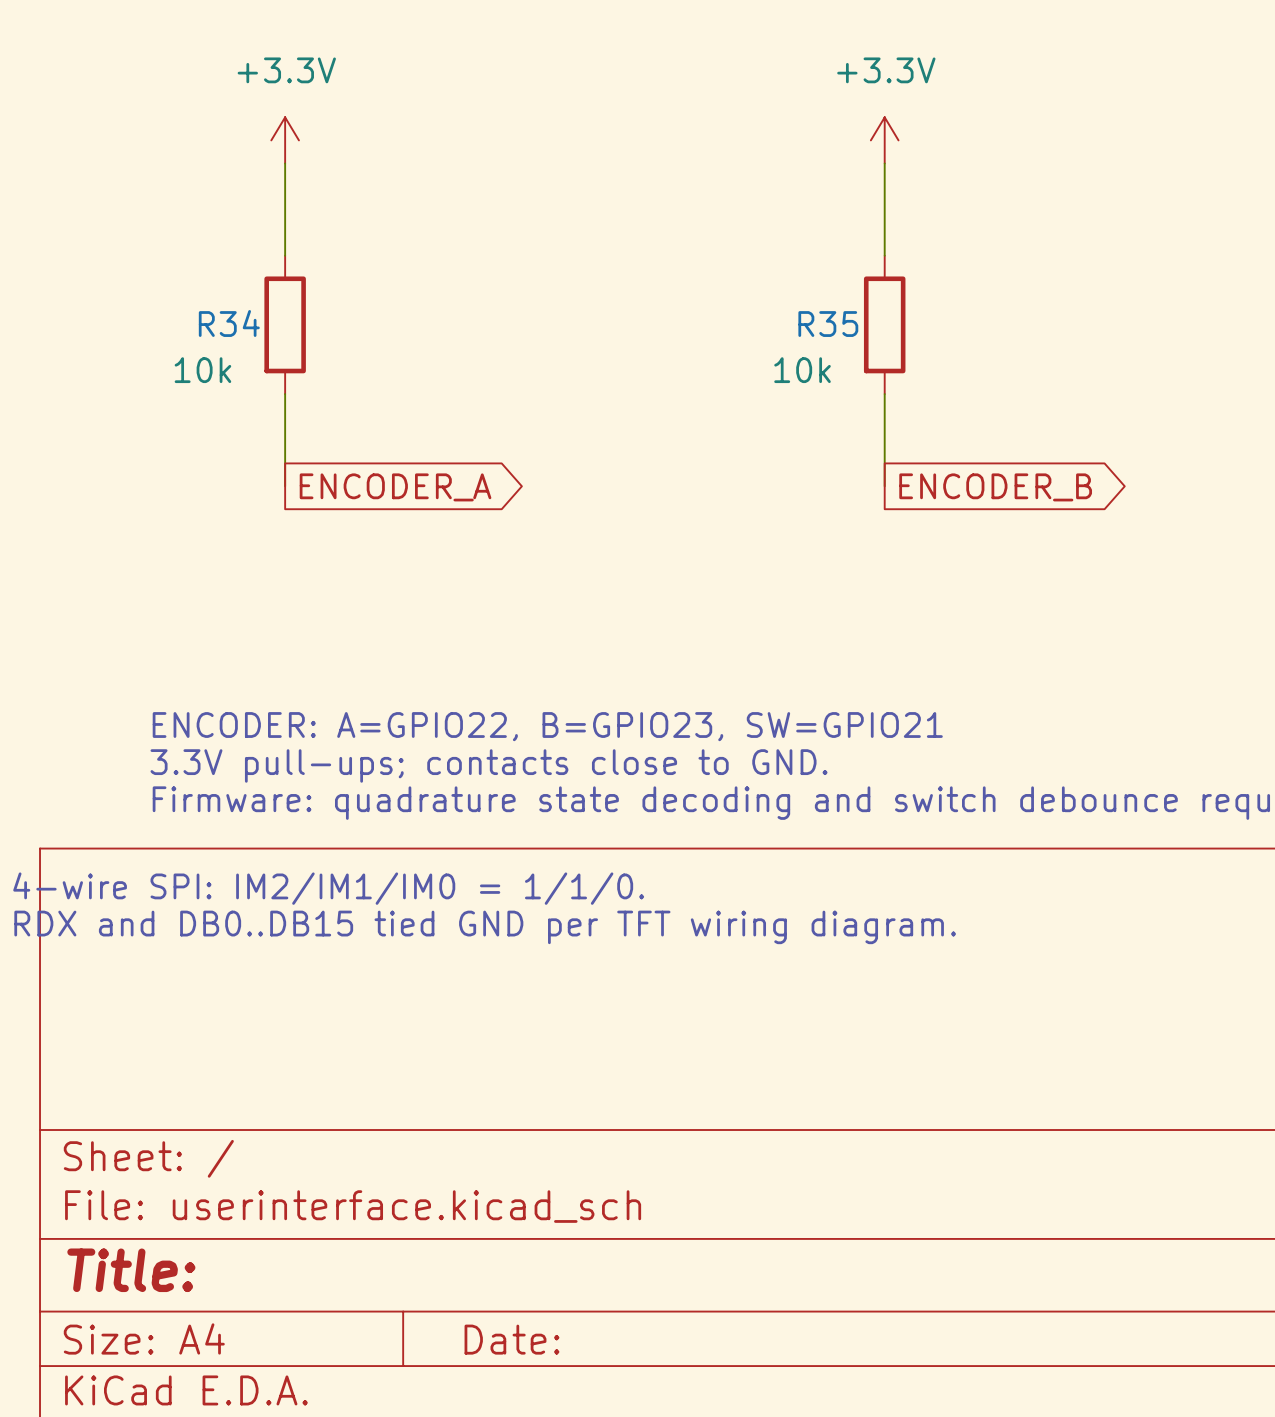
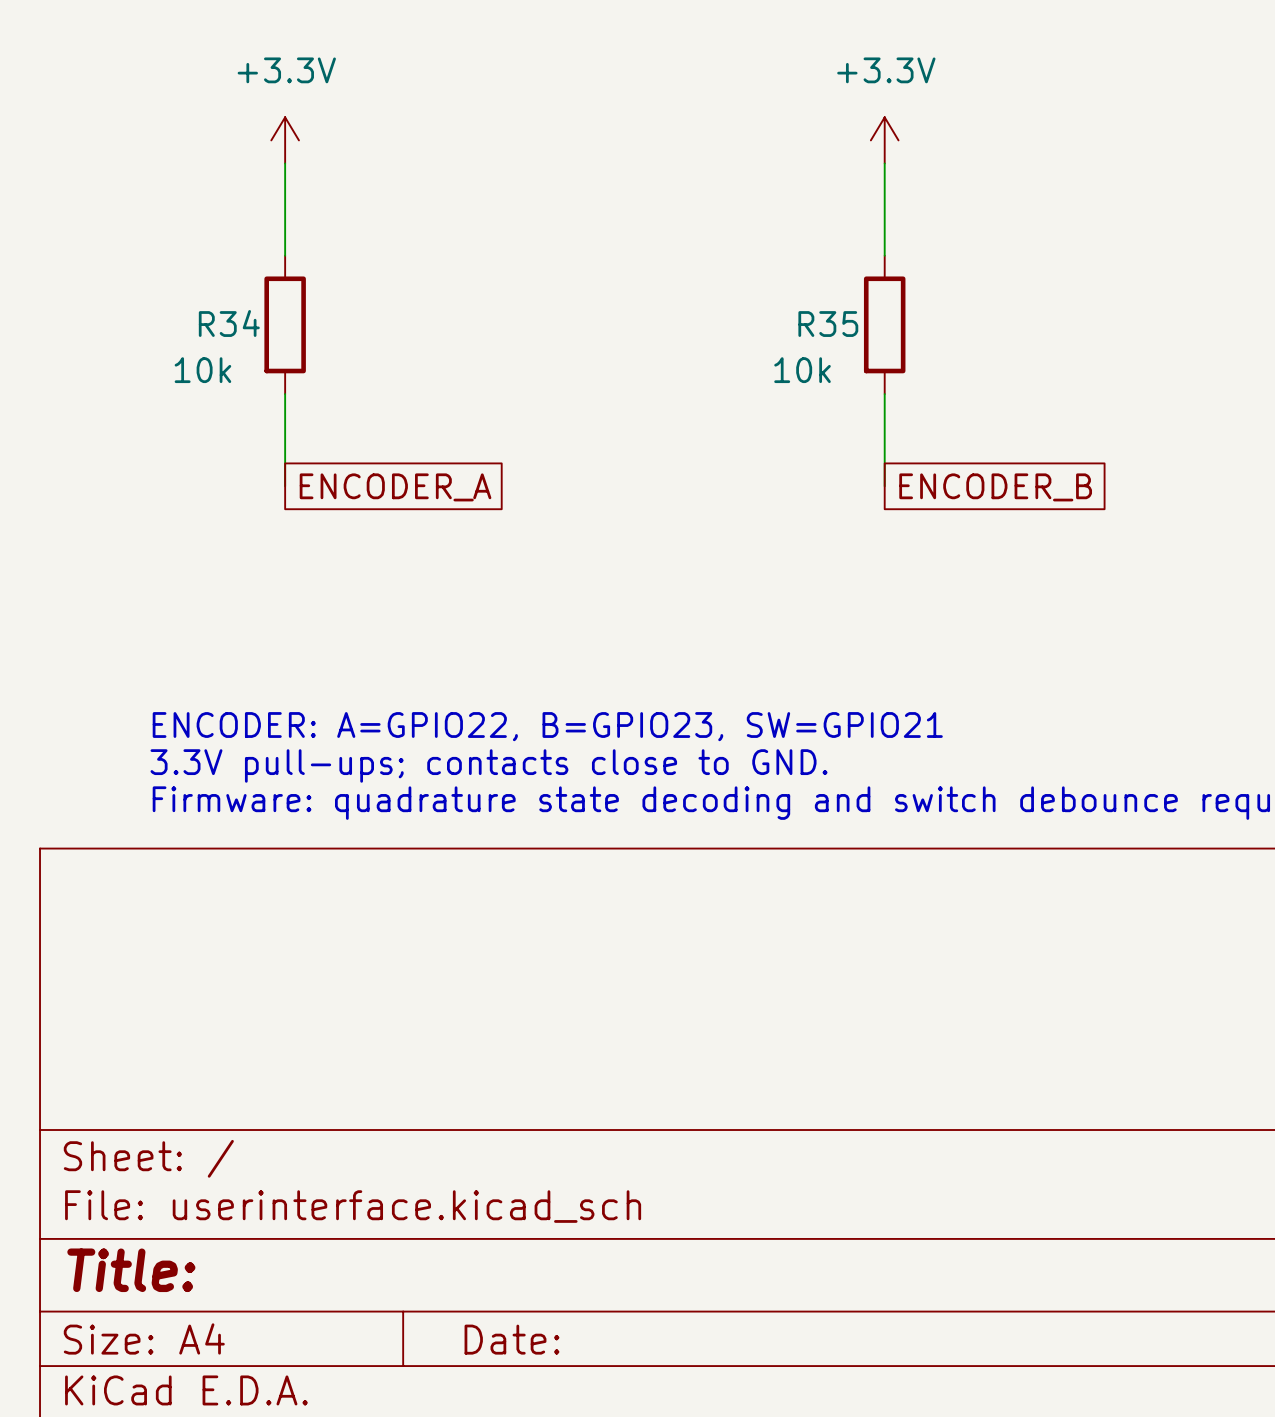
global label shape: output (395, 487) -> passive (395, 487)
global label shape: output (995, 487) -> passive (995, 487)
text: 4-wire SPI: IM2/IM1/IM0 = 1/1/0. (328, 888) -> none
text: RDX and DB0..DB15 tied GND per TFT wiring diagram. (485, 927) -> none

